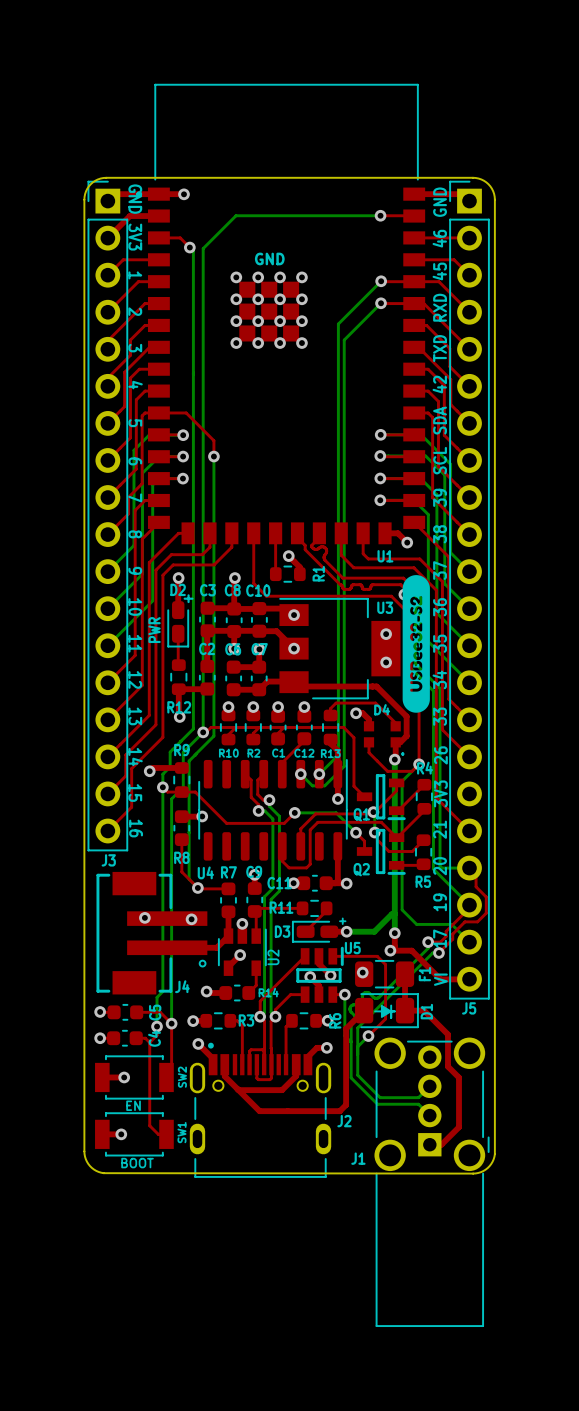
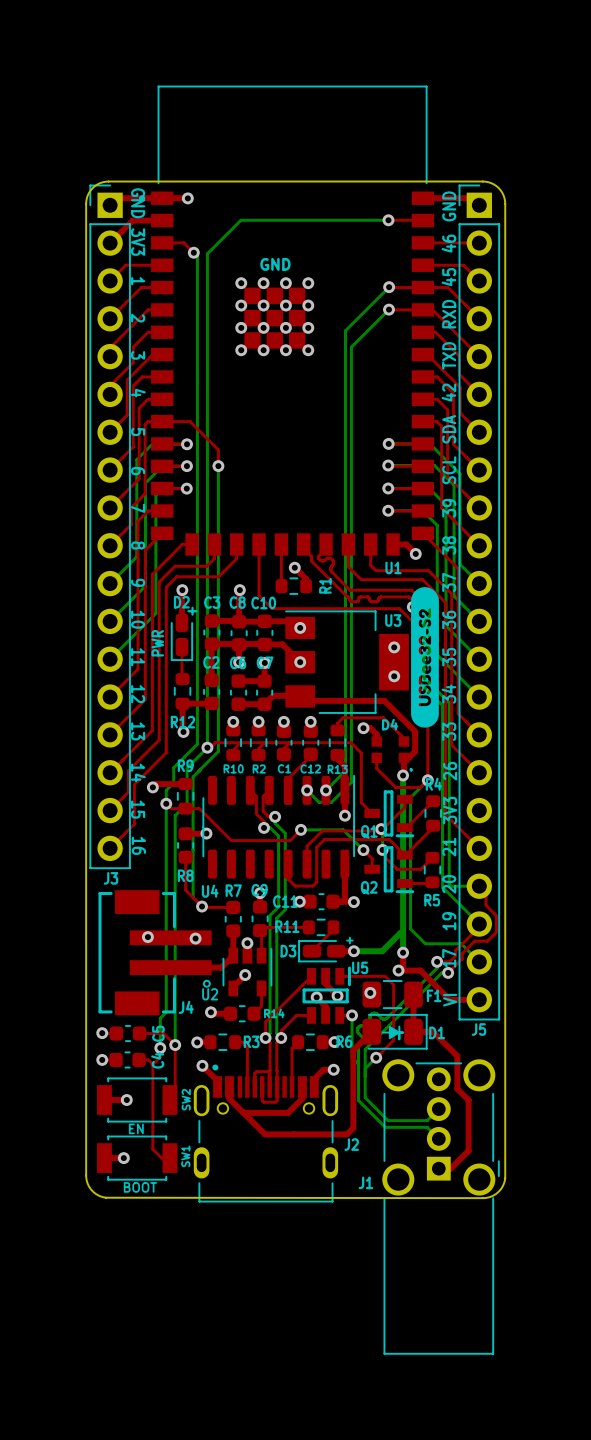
U2 name rotation: 0° (273, 957) -> 90° clockwise (210, 994)
U2 name position: U2 (273, 957) -> U2 (210, 994)
F1 name rotation: 0° (424, 974) -> 90° clockwise (434, 995)
D1 name rotation: 0° (426, 1011) -> 90° clockwise (437, 1032)
R6 name rotation: 0° (335, 1020) -> 90° clockwise (344, 1041)

